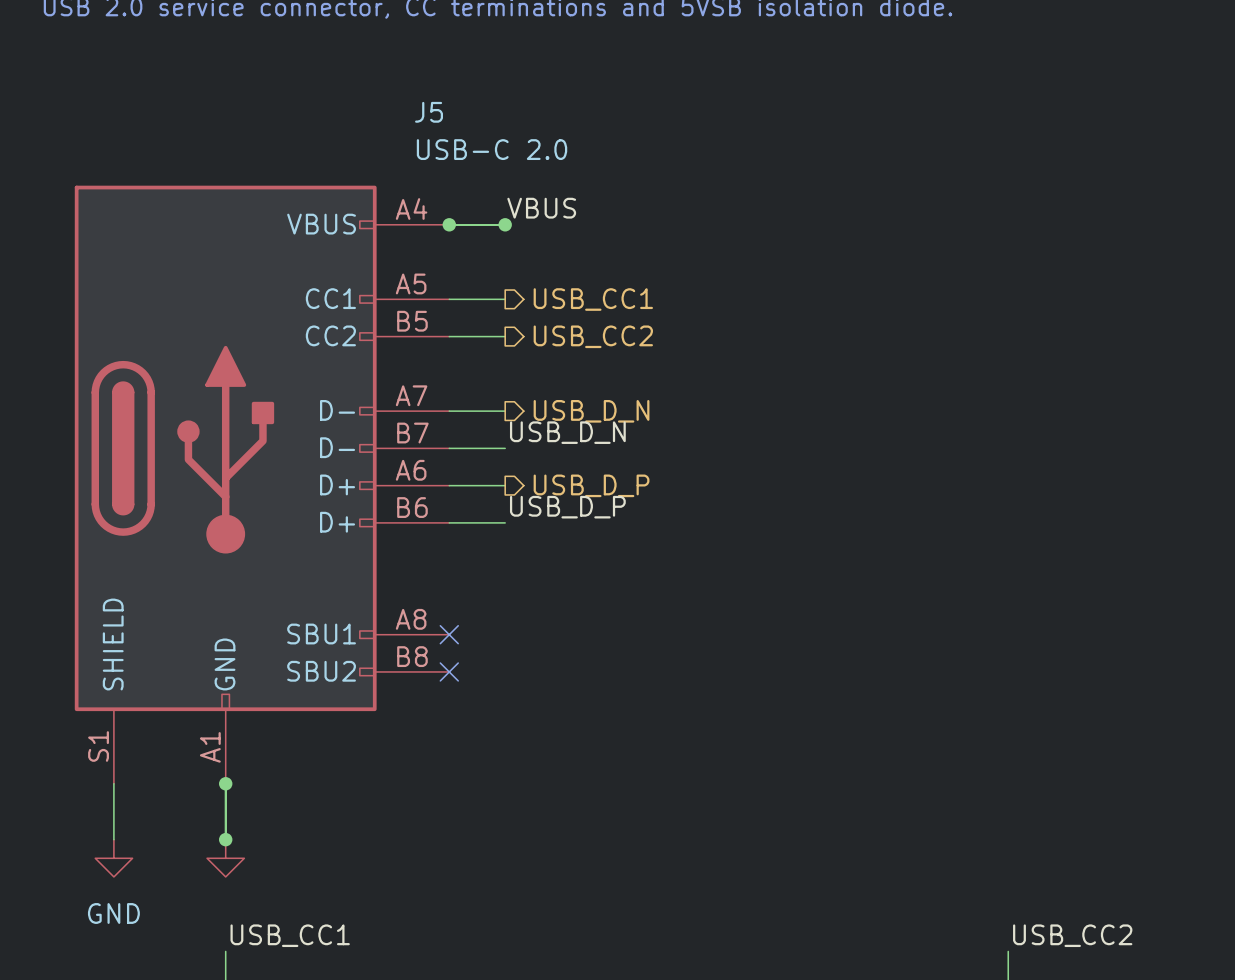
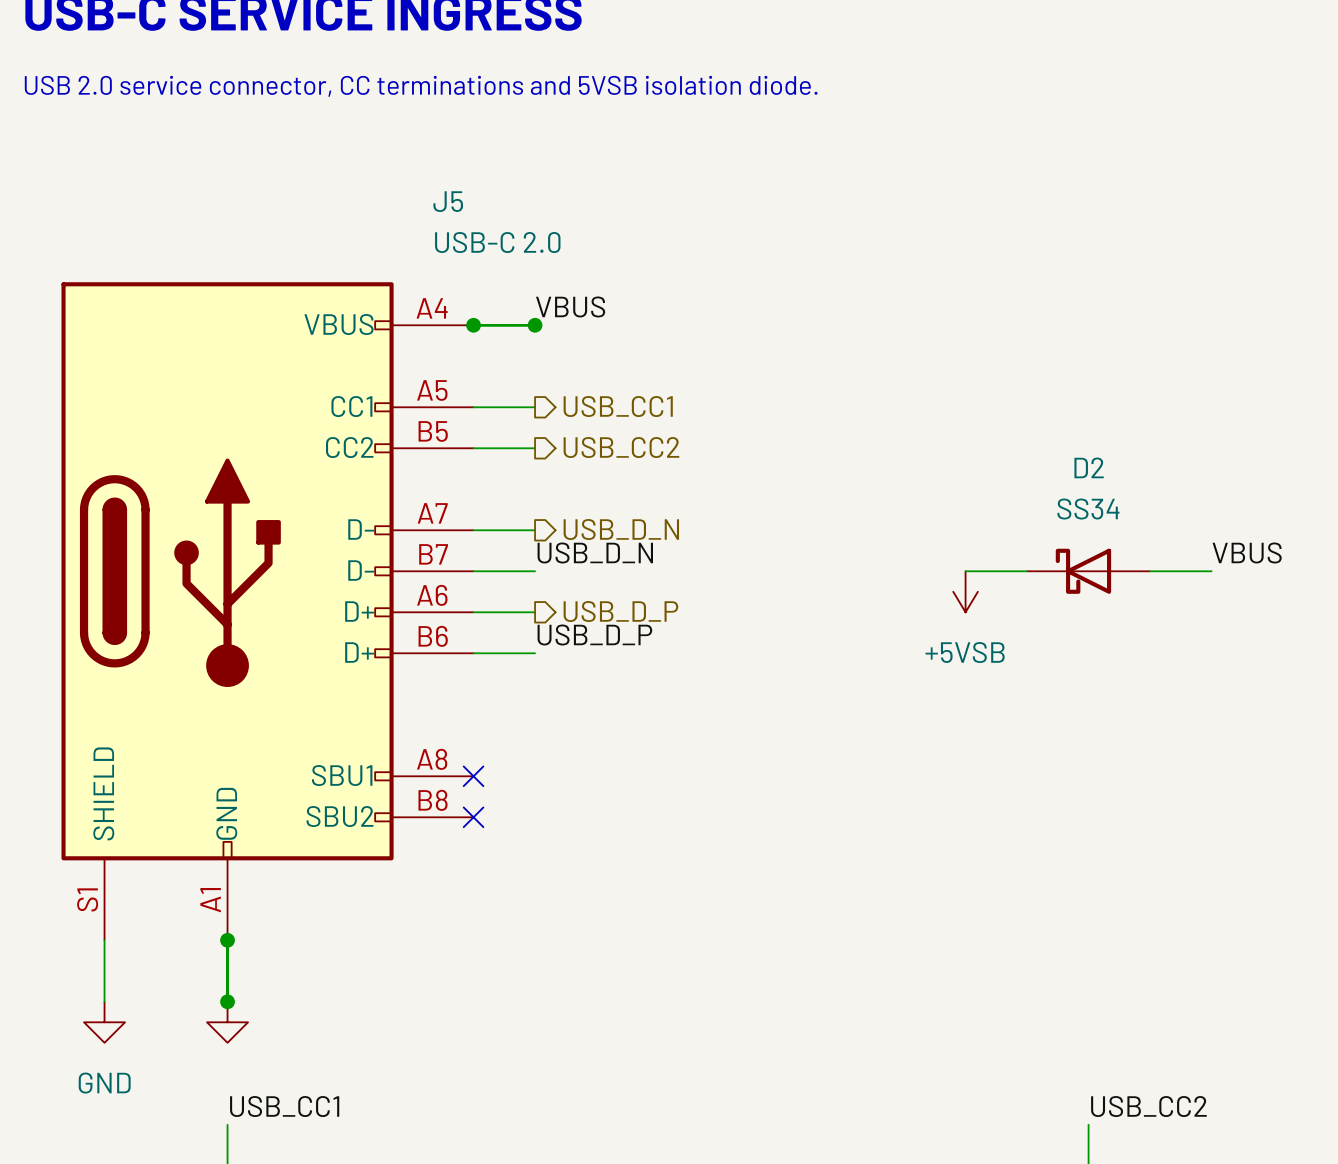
label: none -> VBUS (1247, 552)
wire: none -> (965, 571) (1027, 571)
D2: none -> SS34 (1088, 571)
wire: none -> (1150, 571) (1211, 571)
power symbol: none -> +5VSB (965, 591)

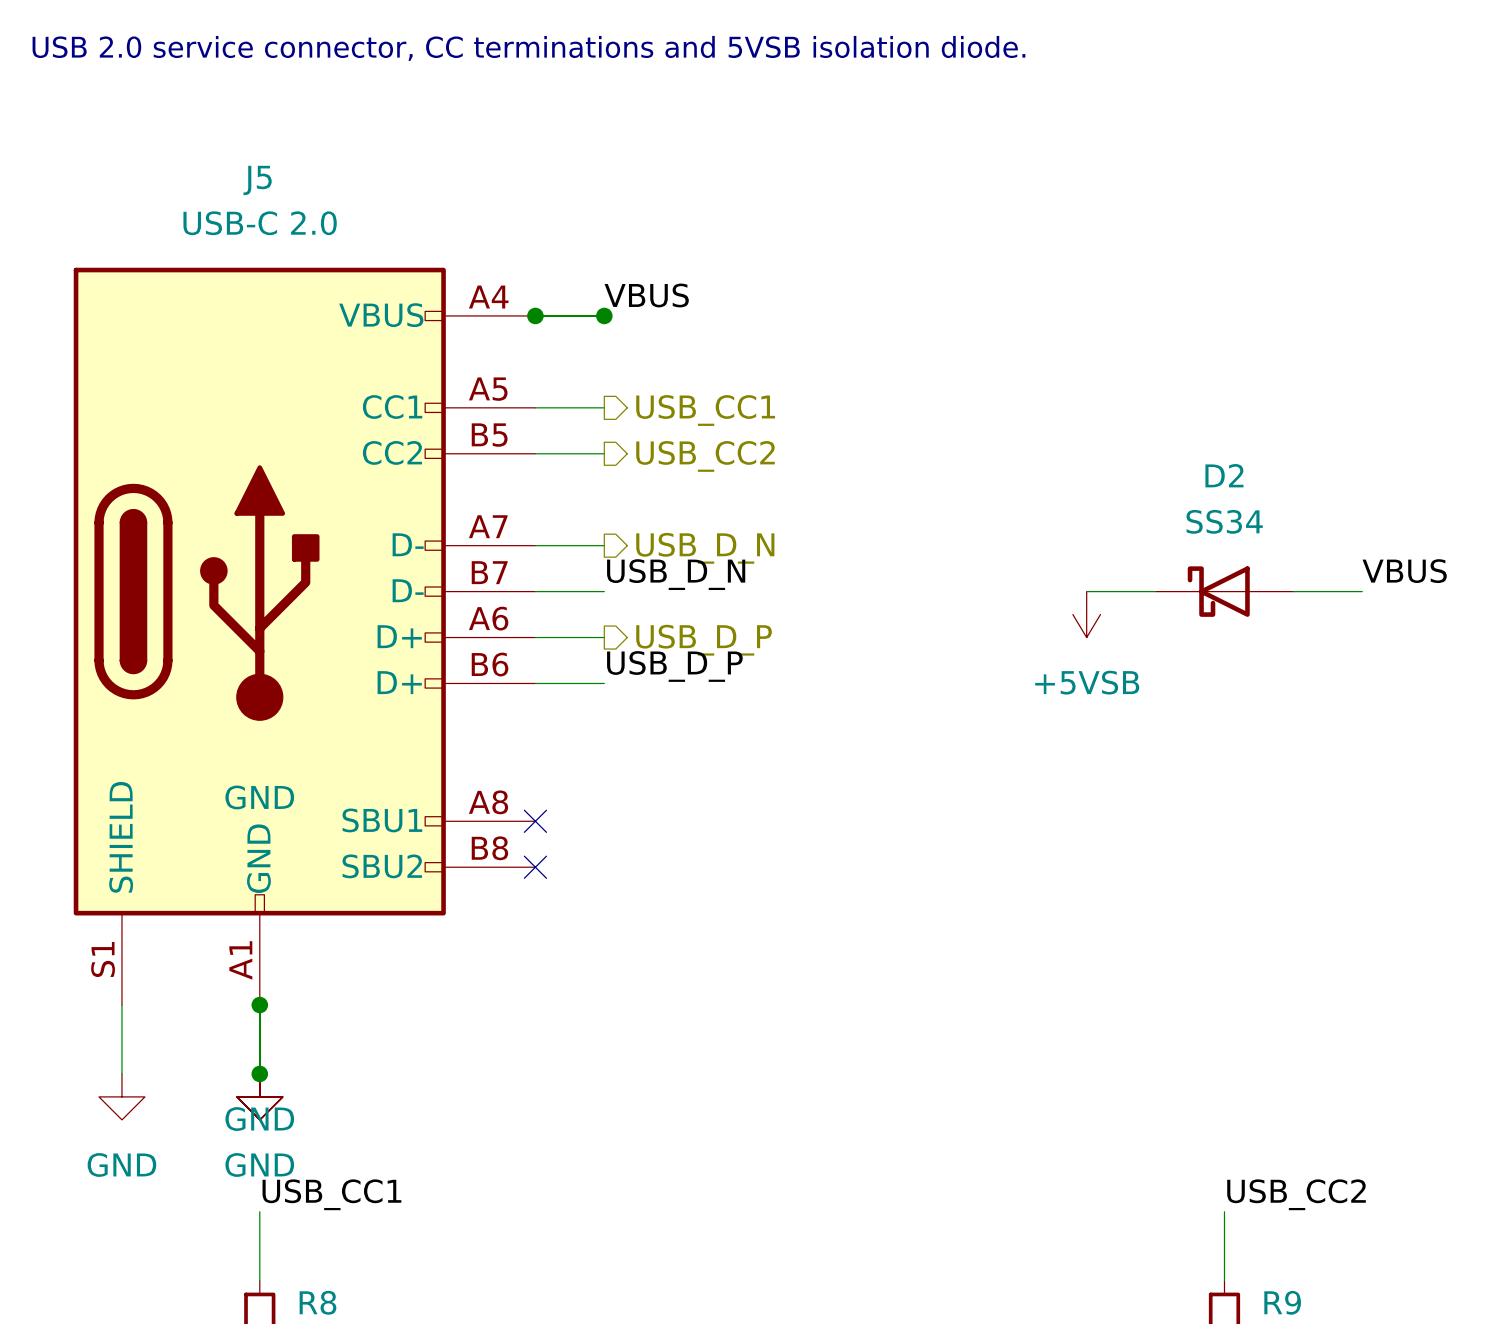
J5 name position: J5 (448, 201) -> J5 (257, 180)
J5 value position: USB-C 2.0 (497, 242) -> USB-C 2.0 (260, 223)
power symbol: none -> GND (259, 1096)
power symbol: none -> GND (259, 1096)
power symbol: none -> GND (259, 1096)

